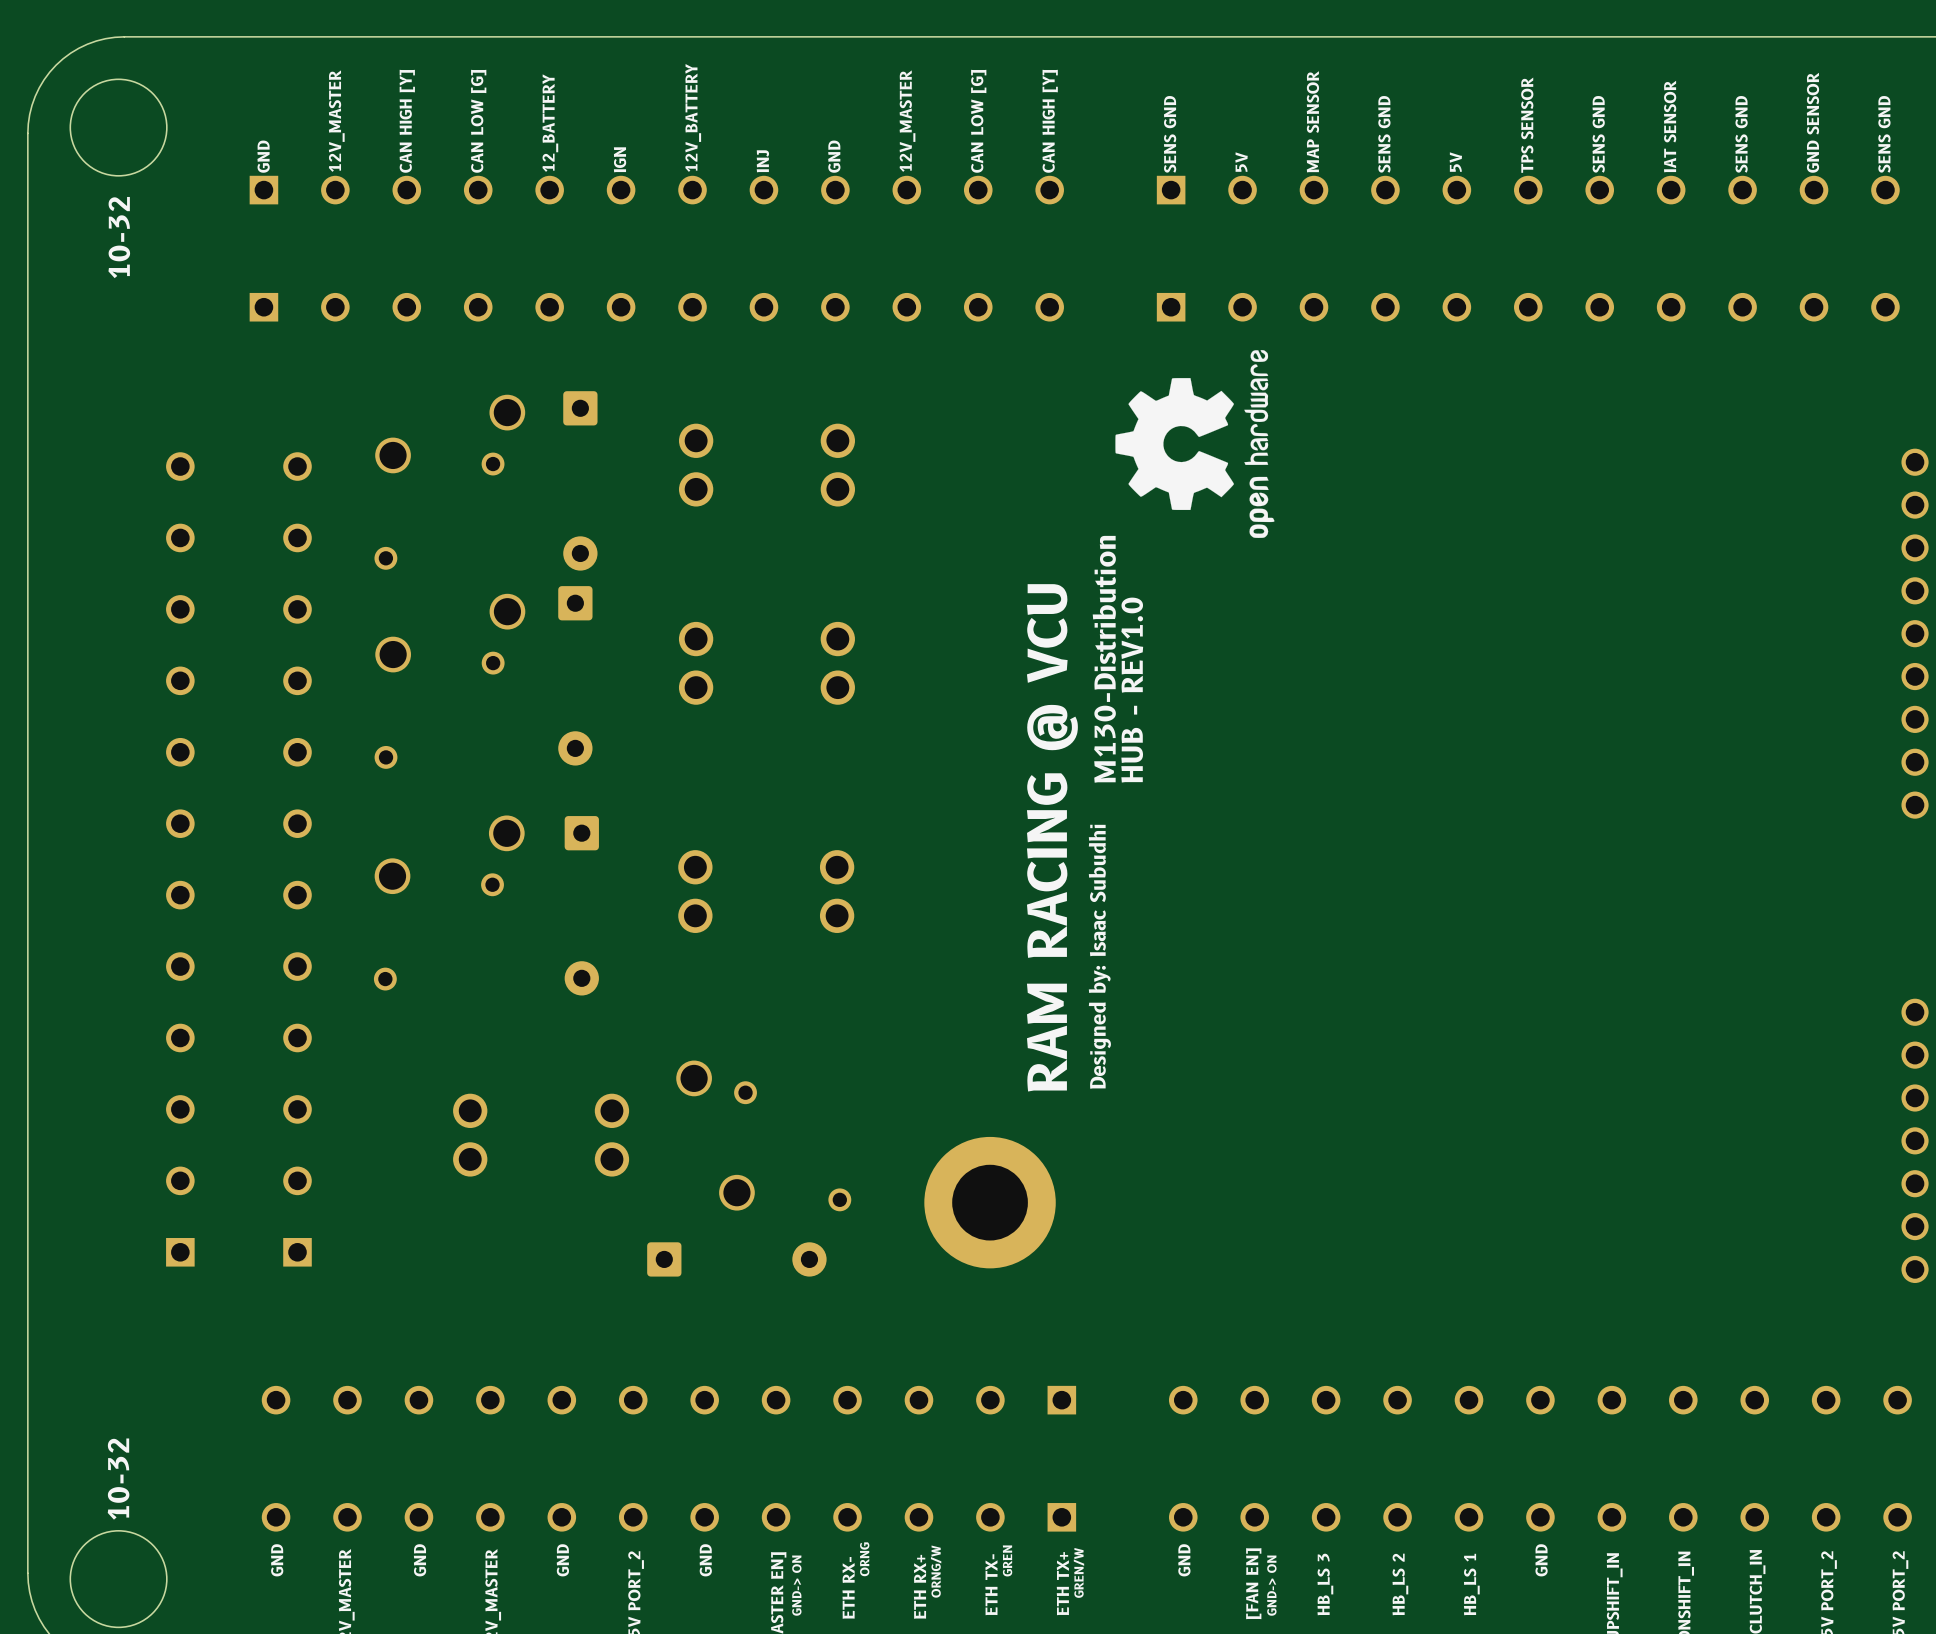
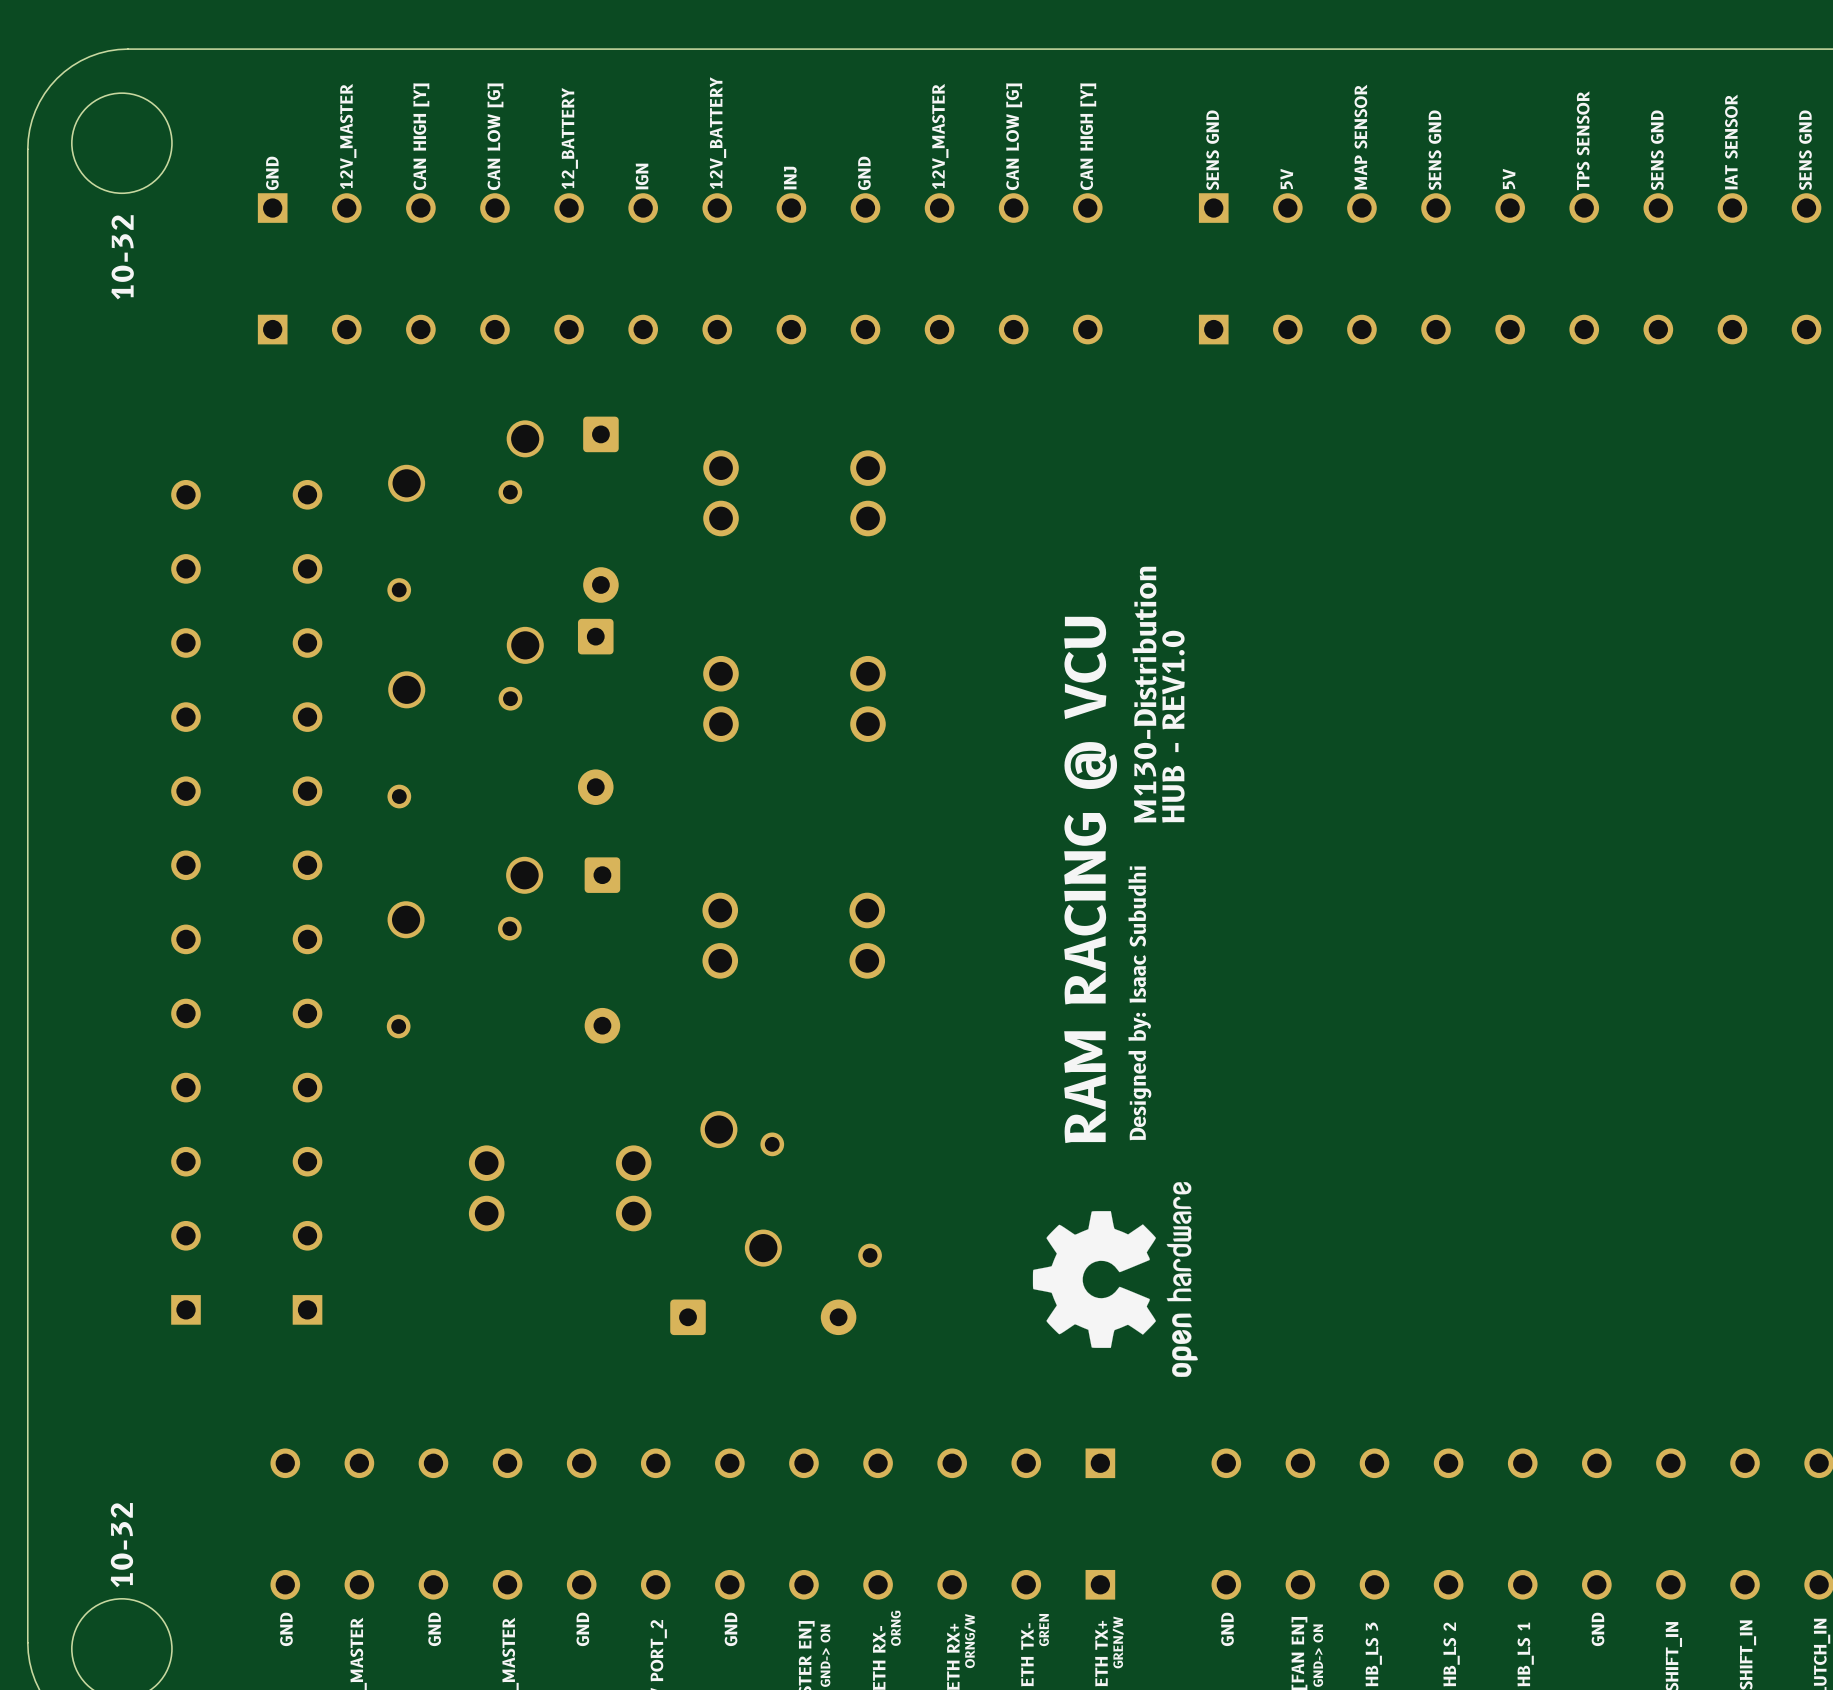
drawing: [1115, 350, 1275, 538] -> none
drawing: none -> [1032, 1182, 1198, 1377]
part: (990, 1202) -> none

